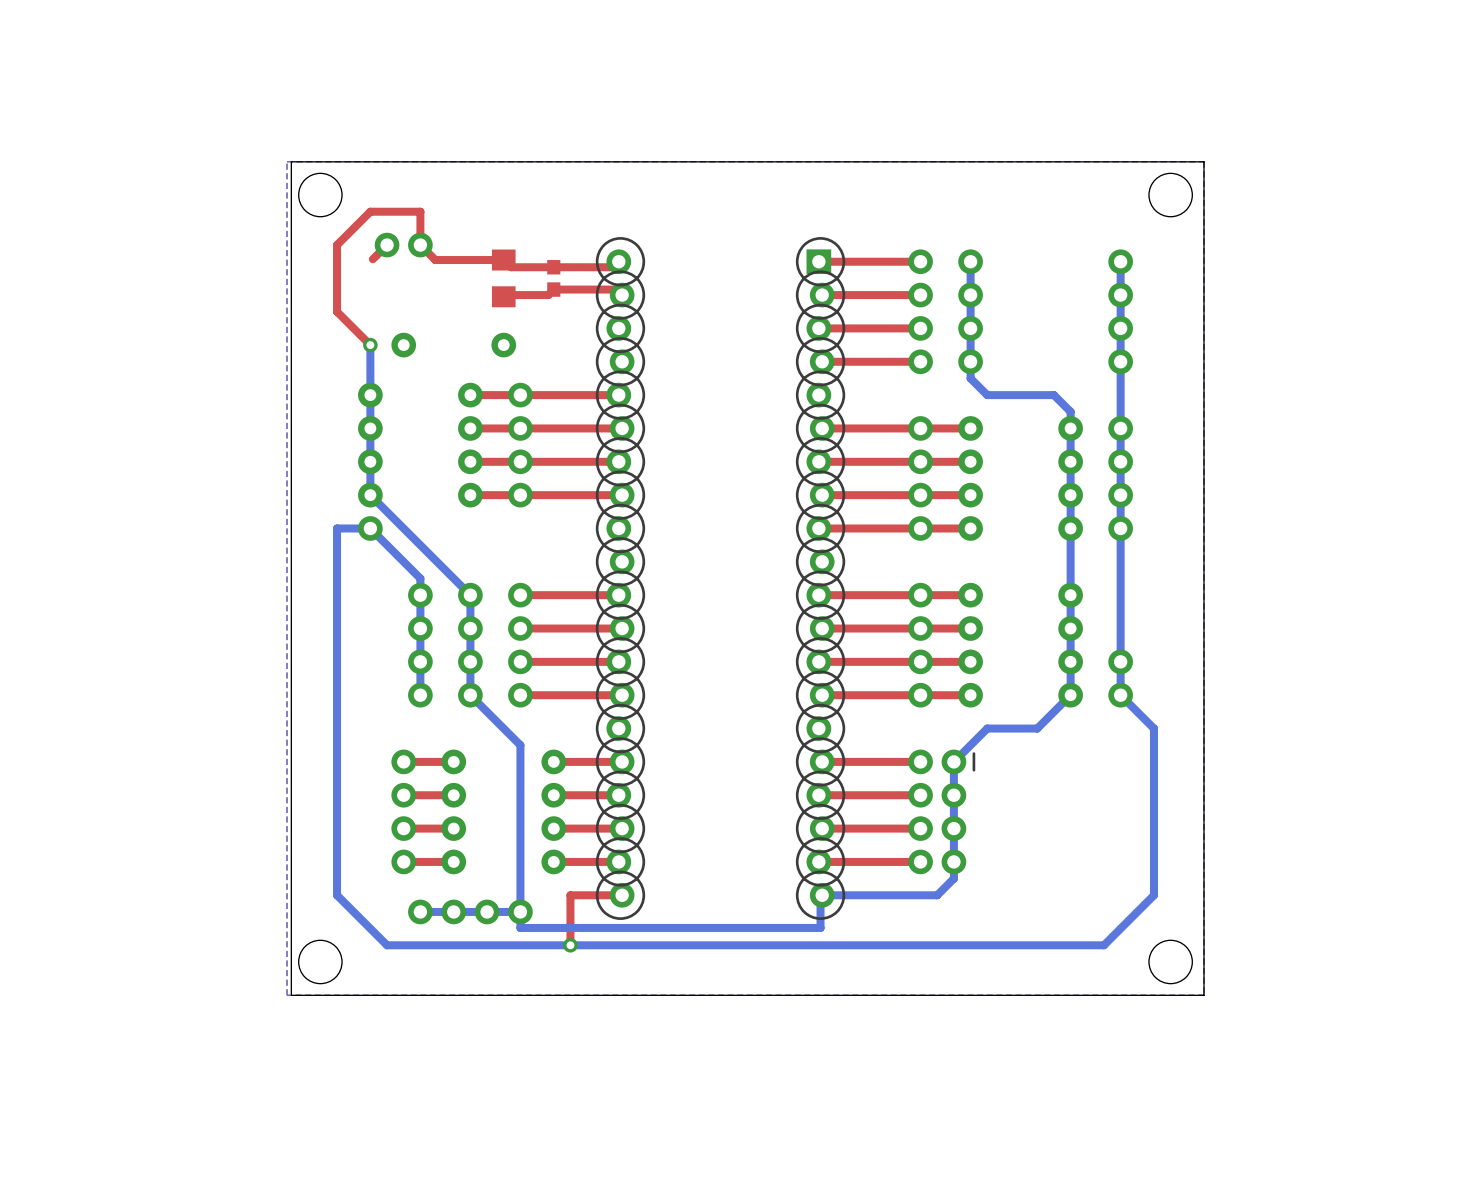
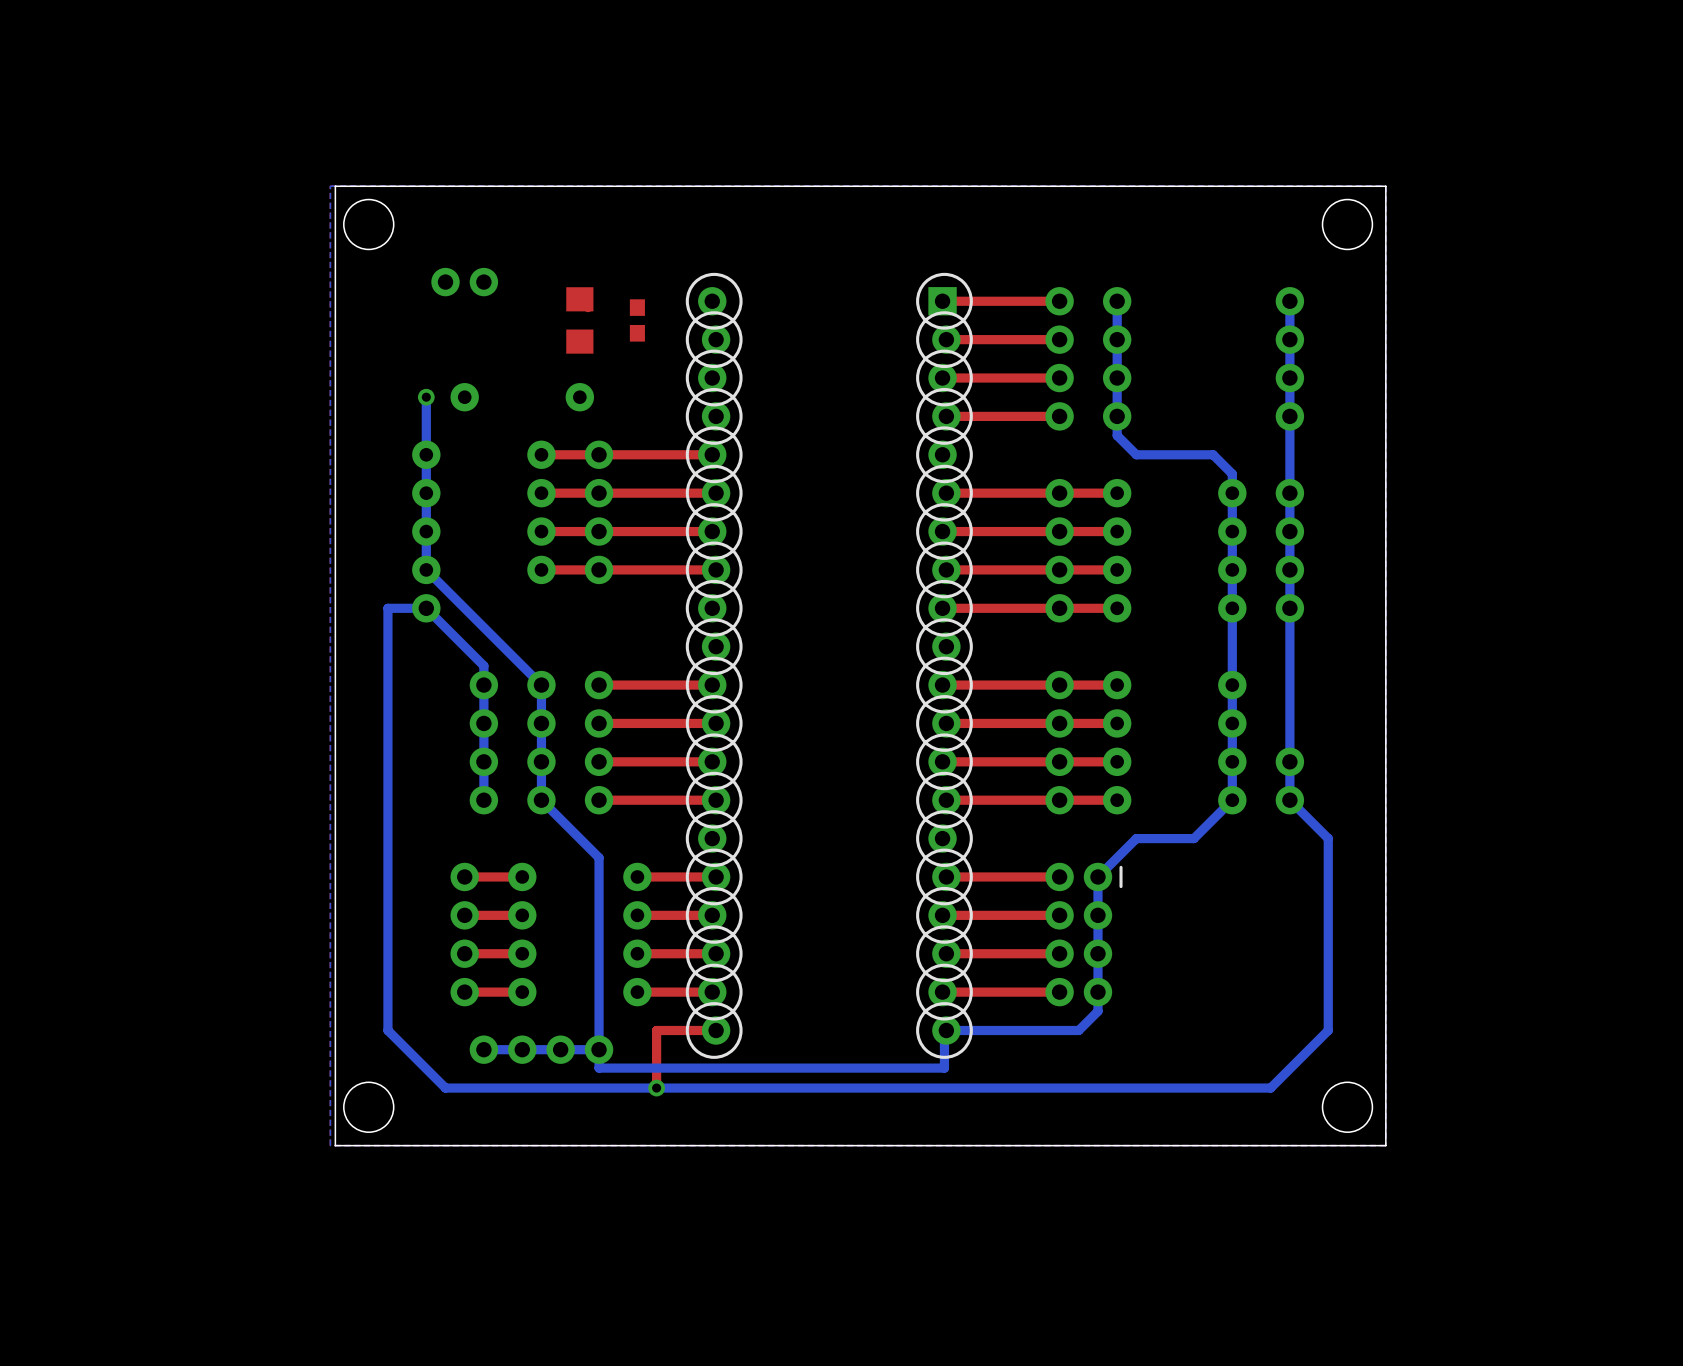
top track: (387, 245) (372, 259) -> none
top track: (503, 260) (435, 260) (420, 245) (420, 211) (370, 211) (337, 245) (337, 311) (370, 345) -> none
top track: (613, 267) (510, 267) -> none
top track: (616, 289) (553, 289) (548, 295) (502, 295) -> none

